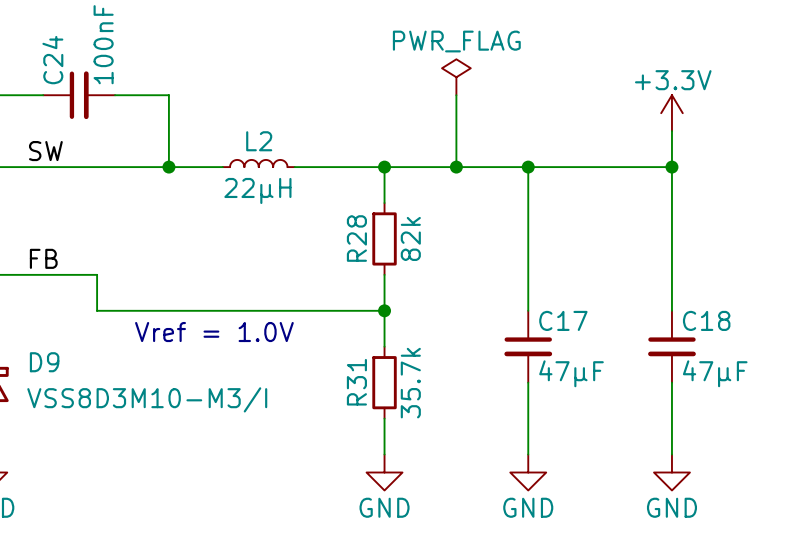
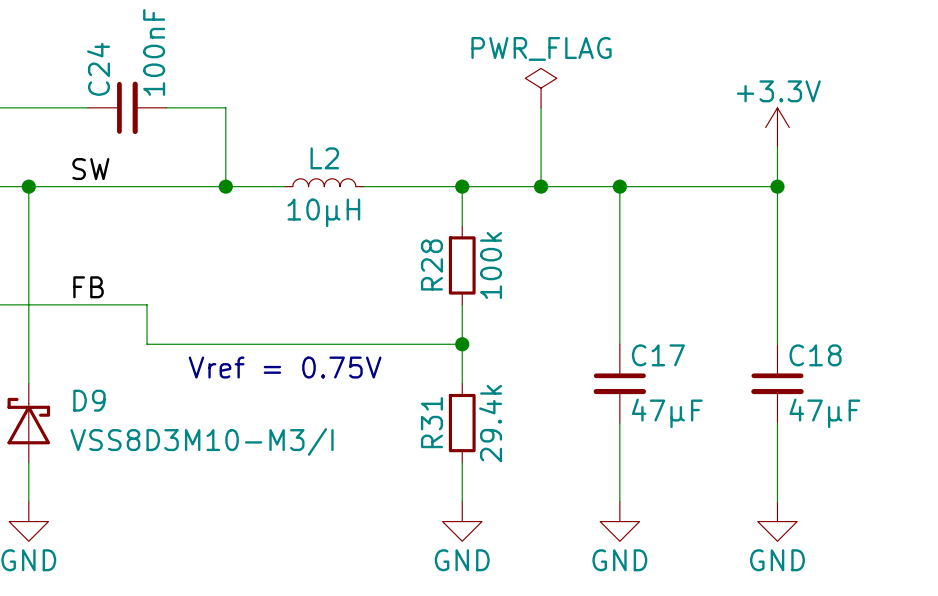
L2 value: 22µH (257, 190) -> 10µH (323, 212)
R28 value: 82k (410, 238) -> 100k (491, 265)
text: Vref = 1.0V (214, 332) -> Vref = 0.75V (285, 367)
R31 value: 35.7k (410, 383) -> 29.4k (490, 423)

